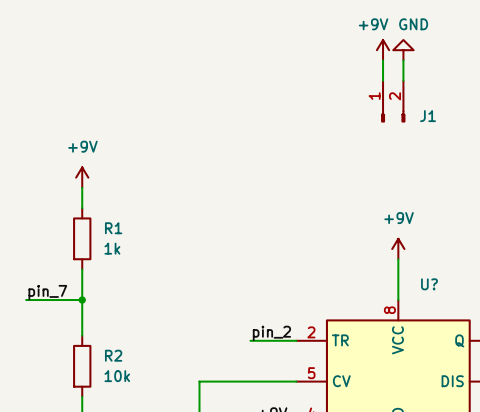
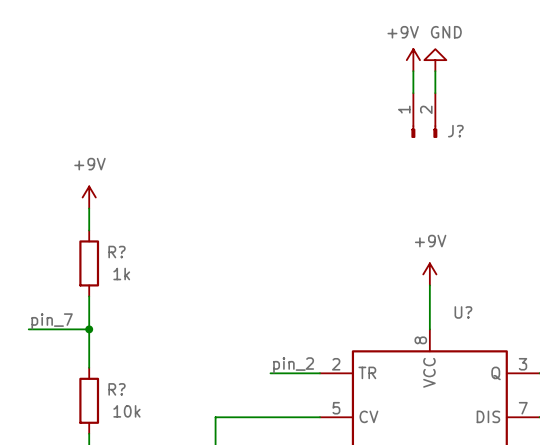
J1 name: J1 (428, 116) -> J? (455, 131)
R1 name: R1 (113, 228) -> R? (117, 252)
R2 name: R2 (113, 355) -> R? (117, 389)

